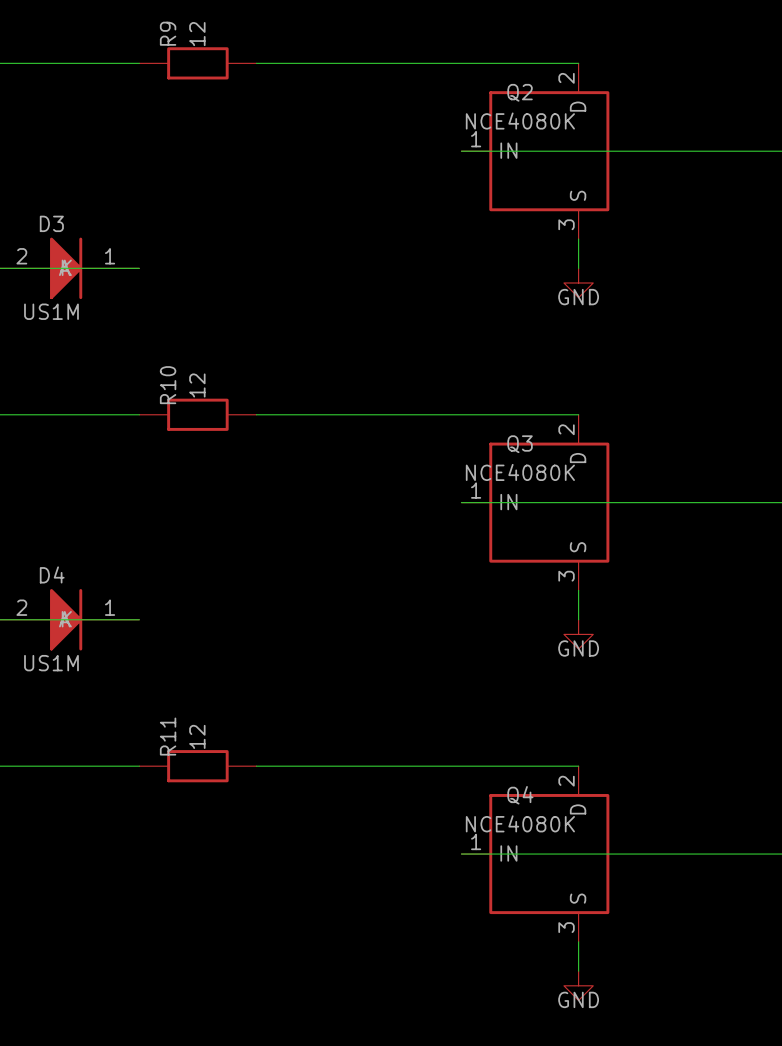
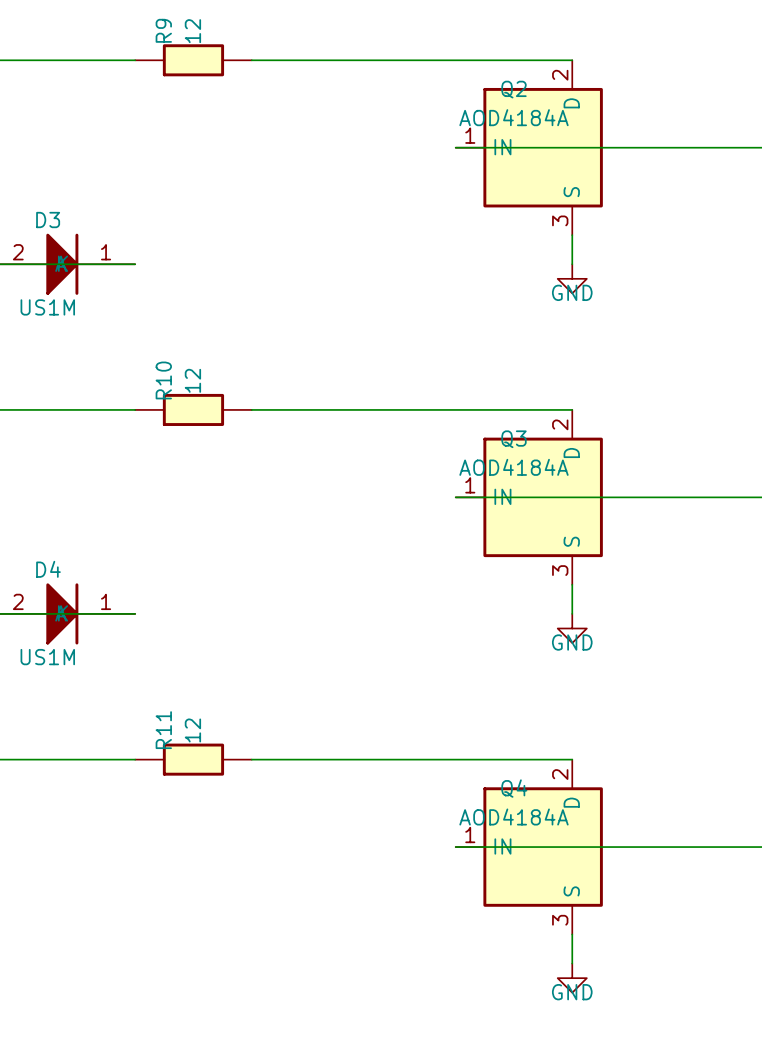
Q2 value: NCE4080K (520, 121) -> AOD4184A (513, 117)
Q3 value: NCE4080K (520, 472) -> AOD4184A (513, 467)
Q4 value: NCE4080K (520, 823) -> AOD4184A (513, 817)

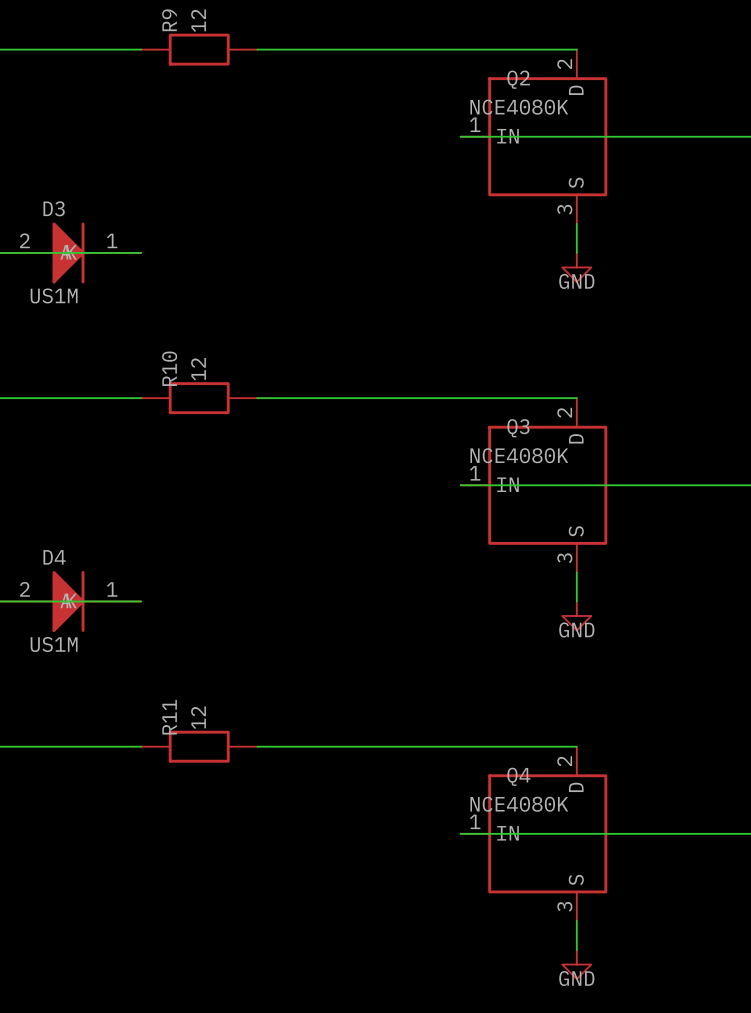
Q2 value: AOD4184A (513, 117) -> NCE4080K (519, 107)
Q3 value: AOD4184A (513, 467) -> NCE4080K (519, 455)
Q4 value: AOD4184A (513, 817) -> NCE4080K (519, 804)

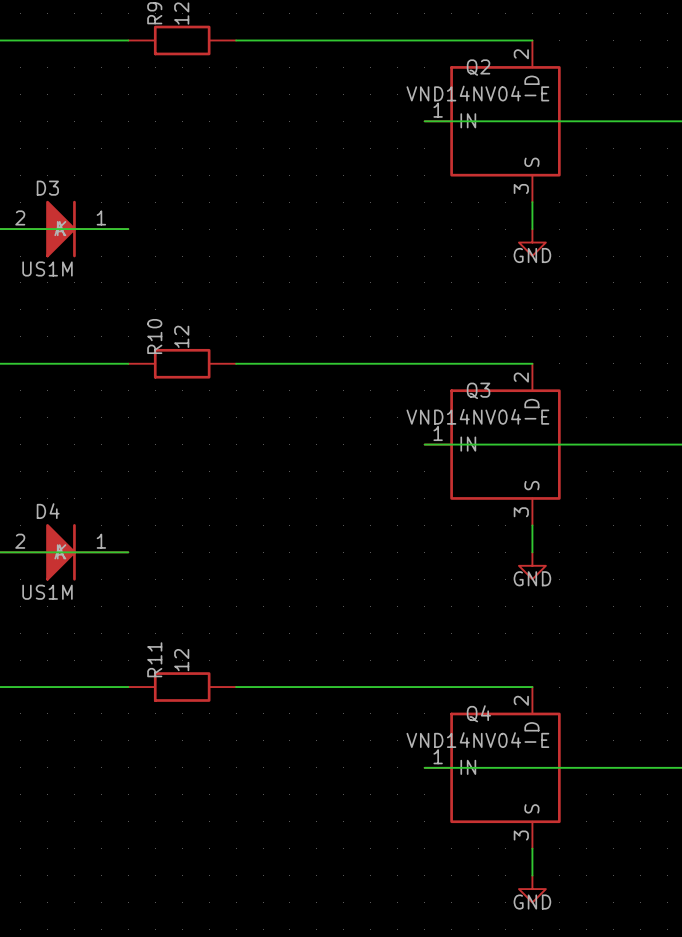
Q2 value: NCE4080K (519, 107) -> VND14NV04-E (477, 93)
Q3 value: NCE4080K (519, 455) -> VND14NV04-E (477, 416)
Q4 value: NCE4080K (519, 804) -> VND14NV04-E (477, 740)

